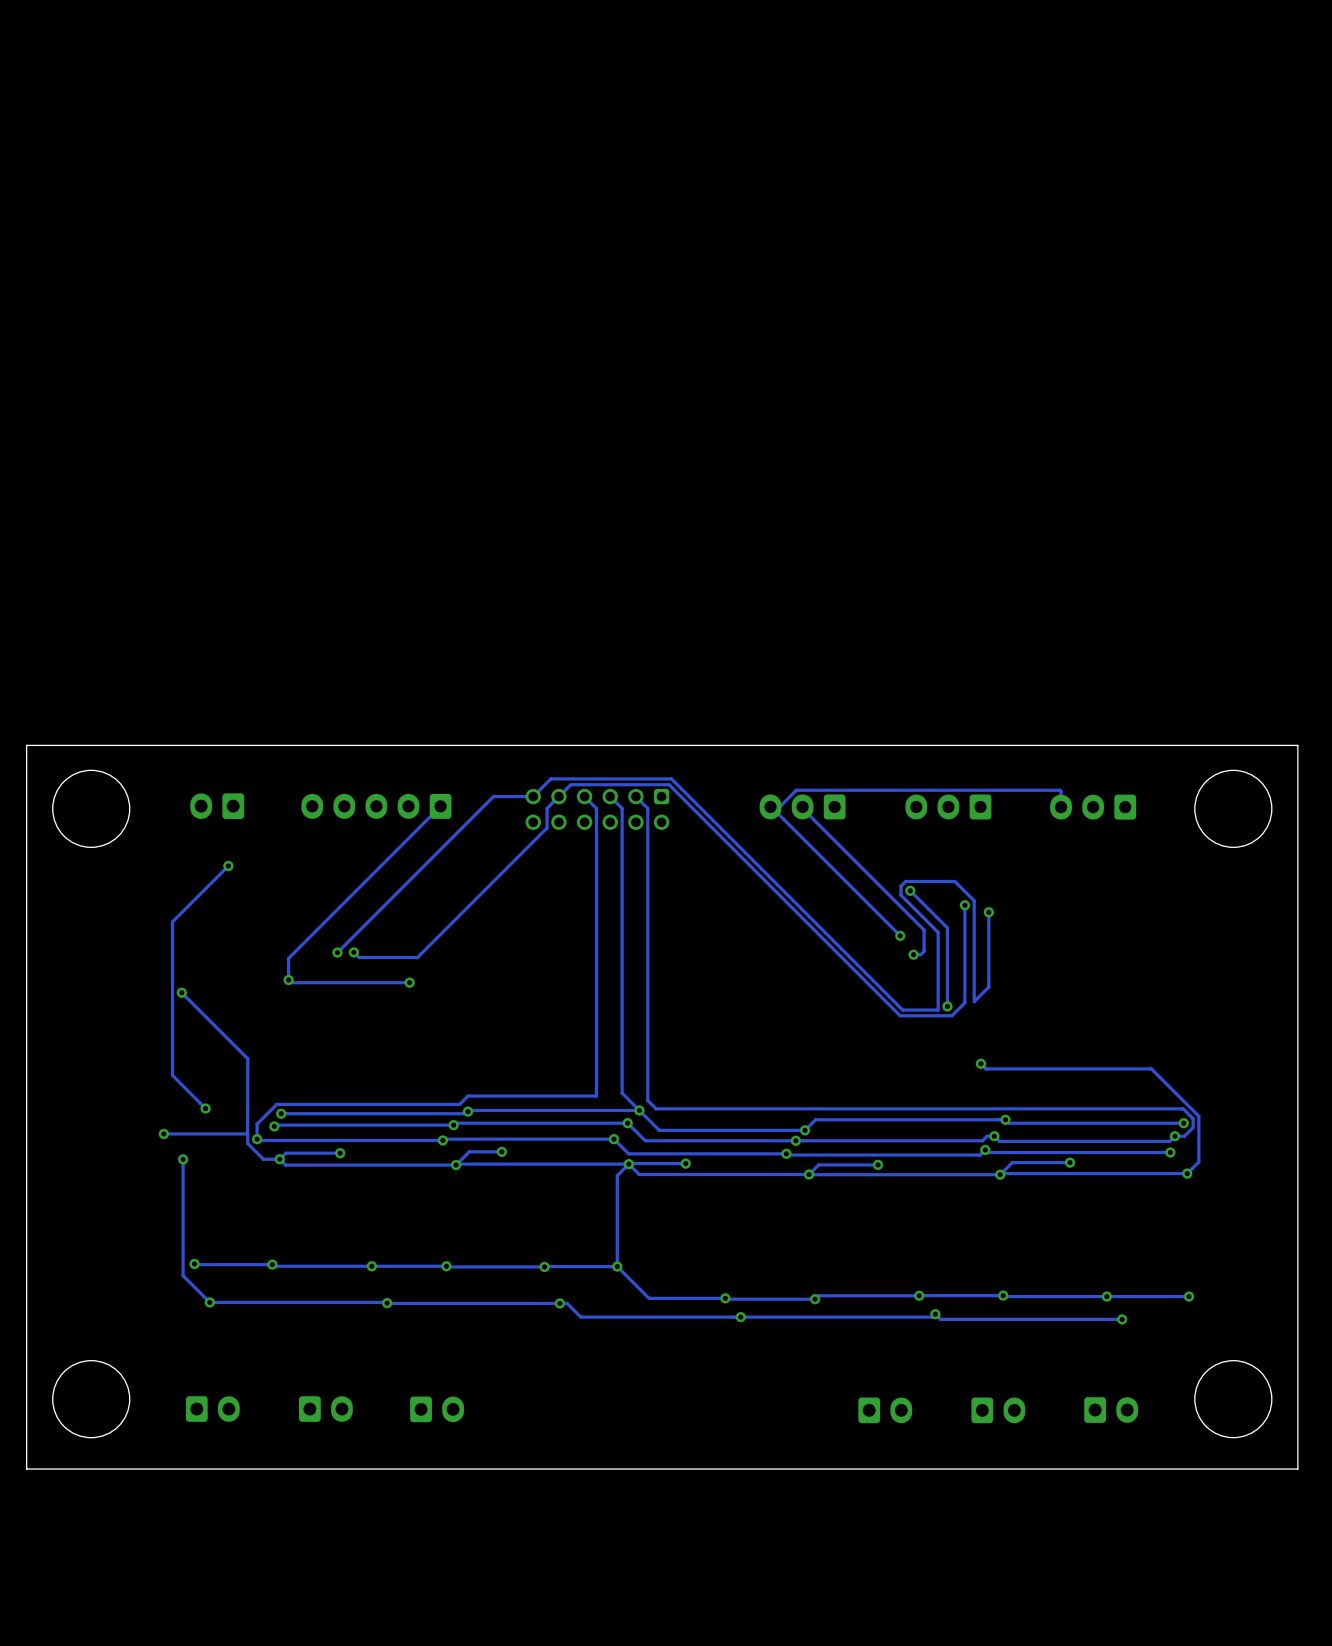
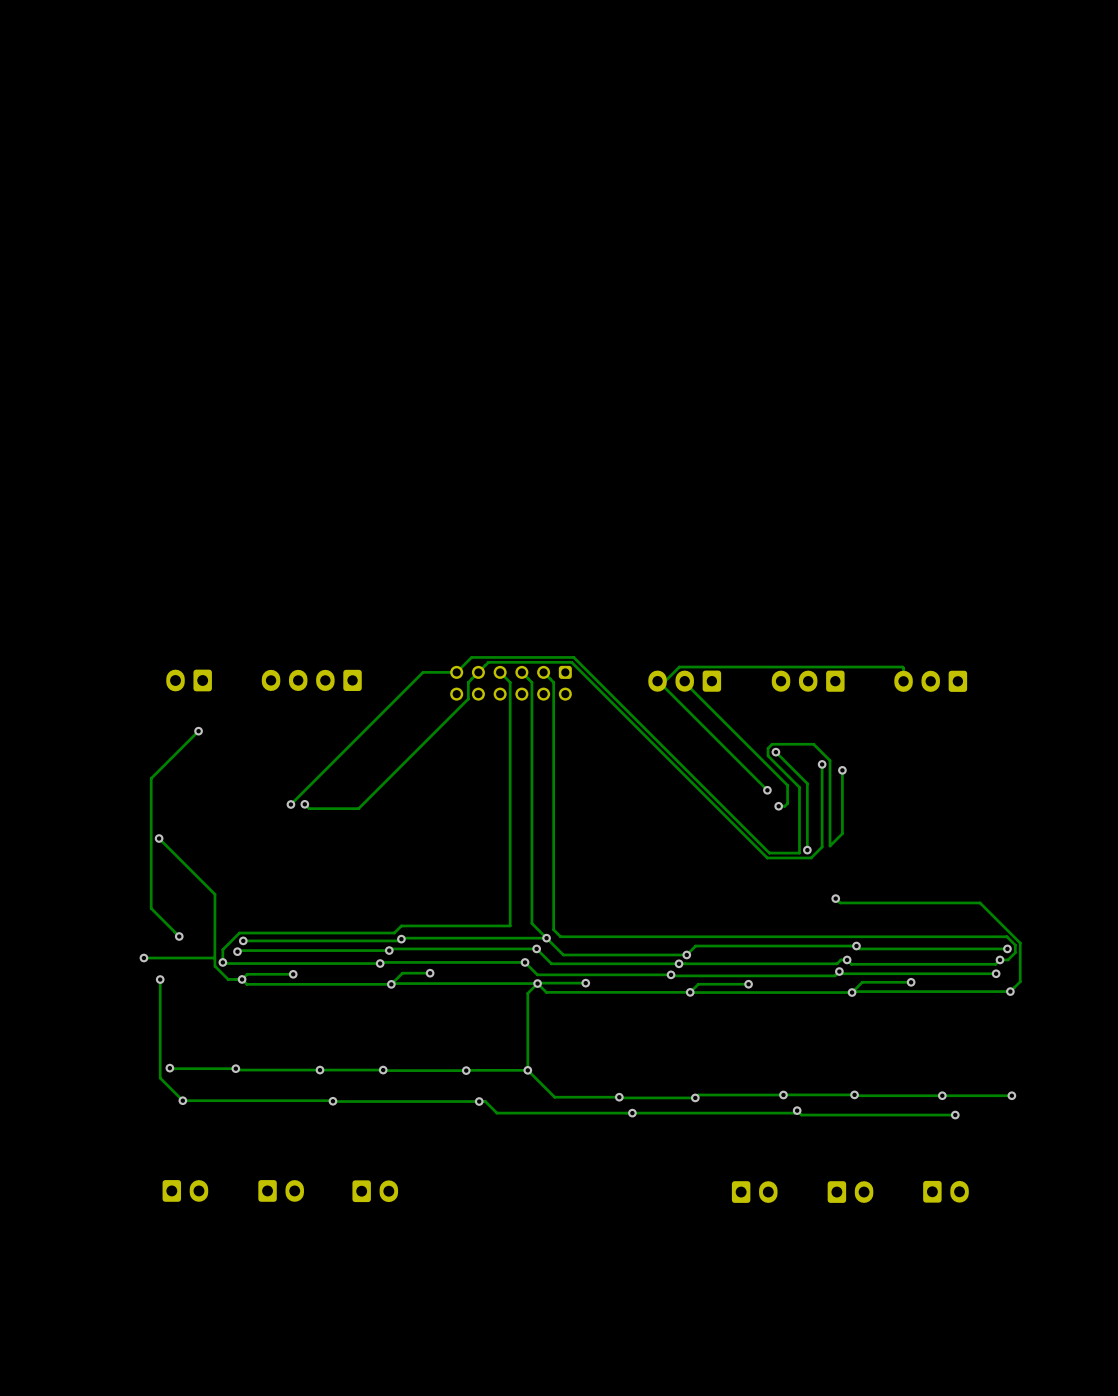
board edge: (1297, 745) (26, 745) (26, 1469) (1297, 1469) (1297, 745) -> none
round board edge: [52, 770, 131, 848] -> none
round board edge: [1194, 770, 1273, 848] -> none
part: none -> (311, 680)
part: (376, 806) -> none
track: (440, 806) (288, 958) (288, 979) (291, 982) (409, 982) -> none
via: (288, 979) -> none
via: (409, 982) -> none
round board edge: [52, 1360, 131, 1438] -> none
round board edge: [1194, 1360, 1273, 1438] -> none

